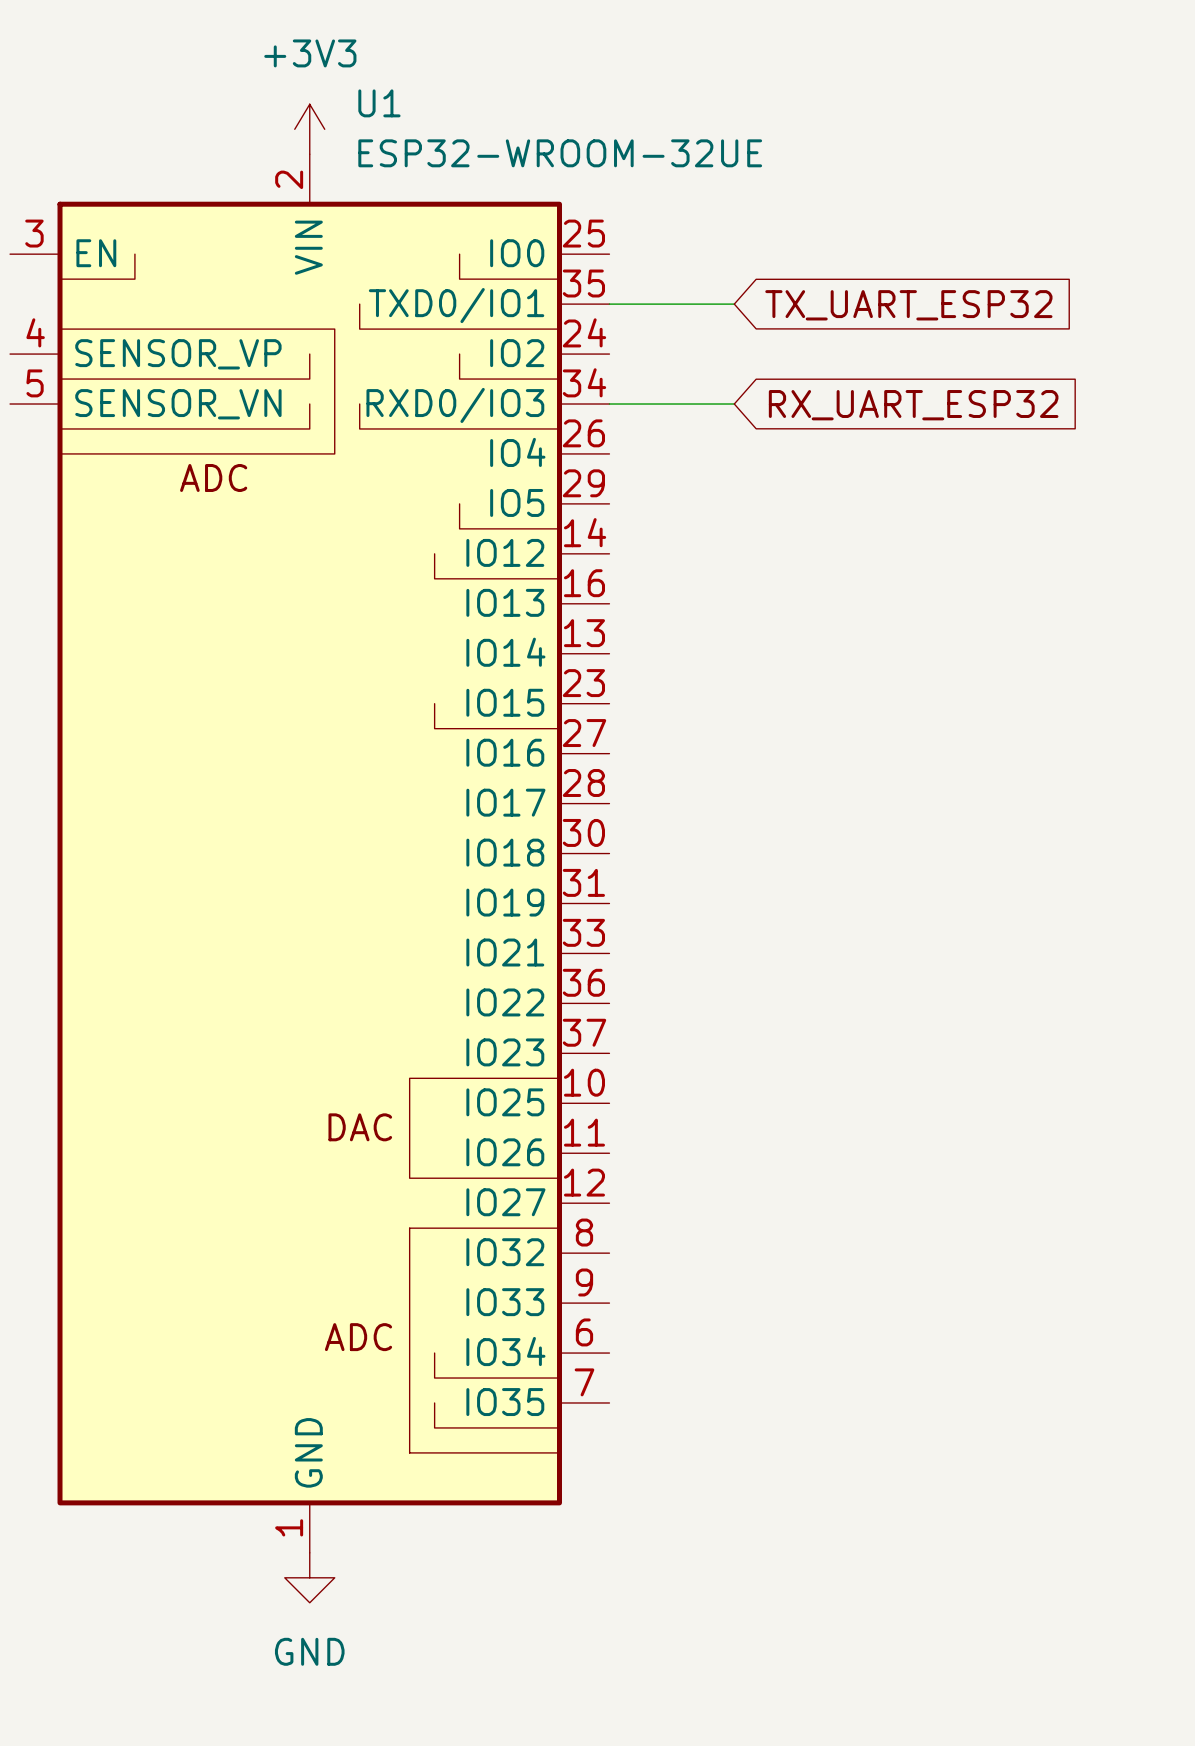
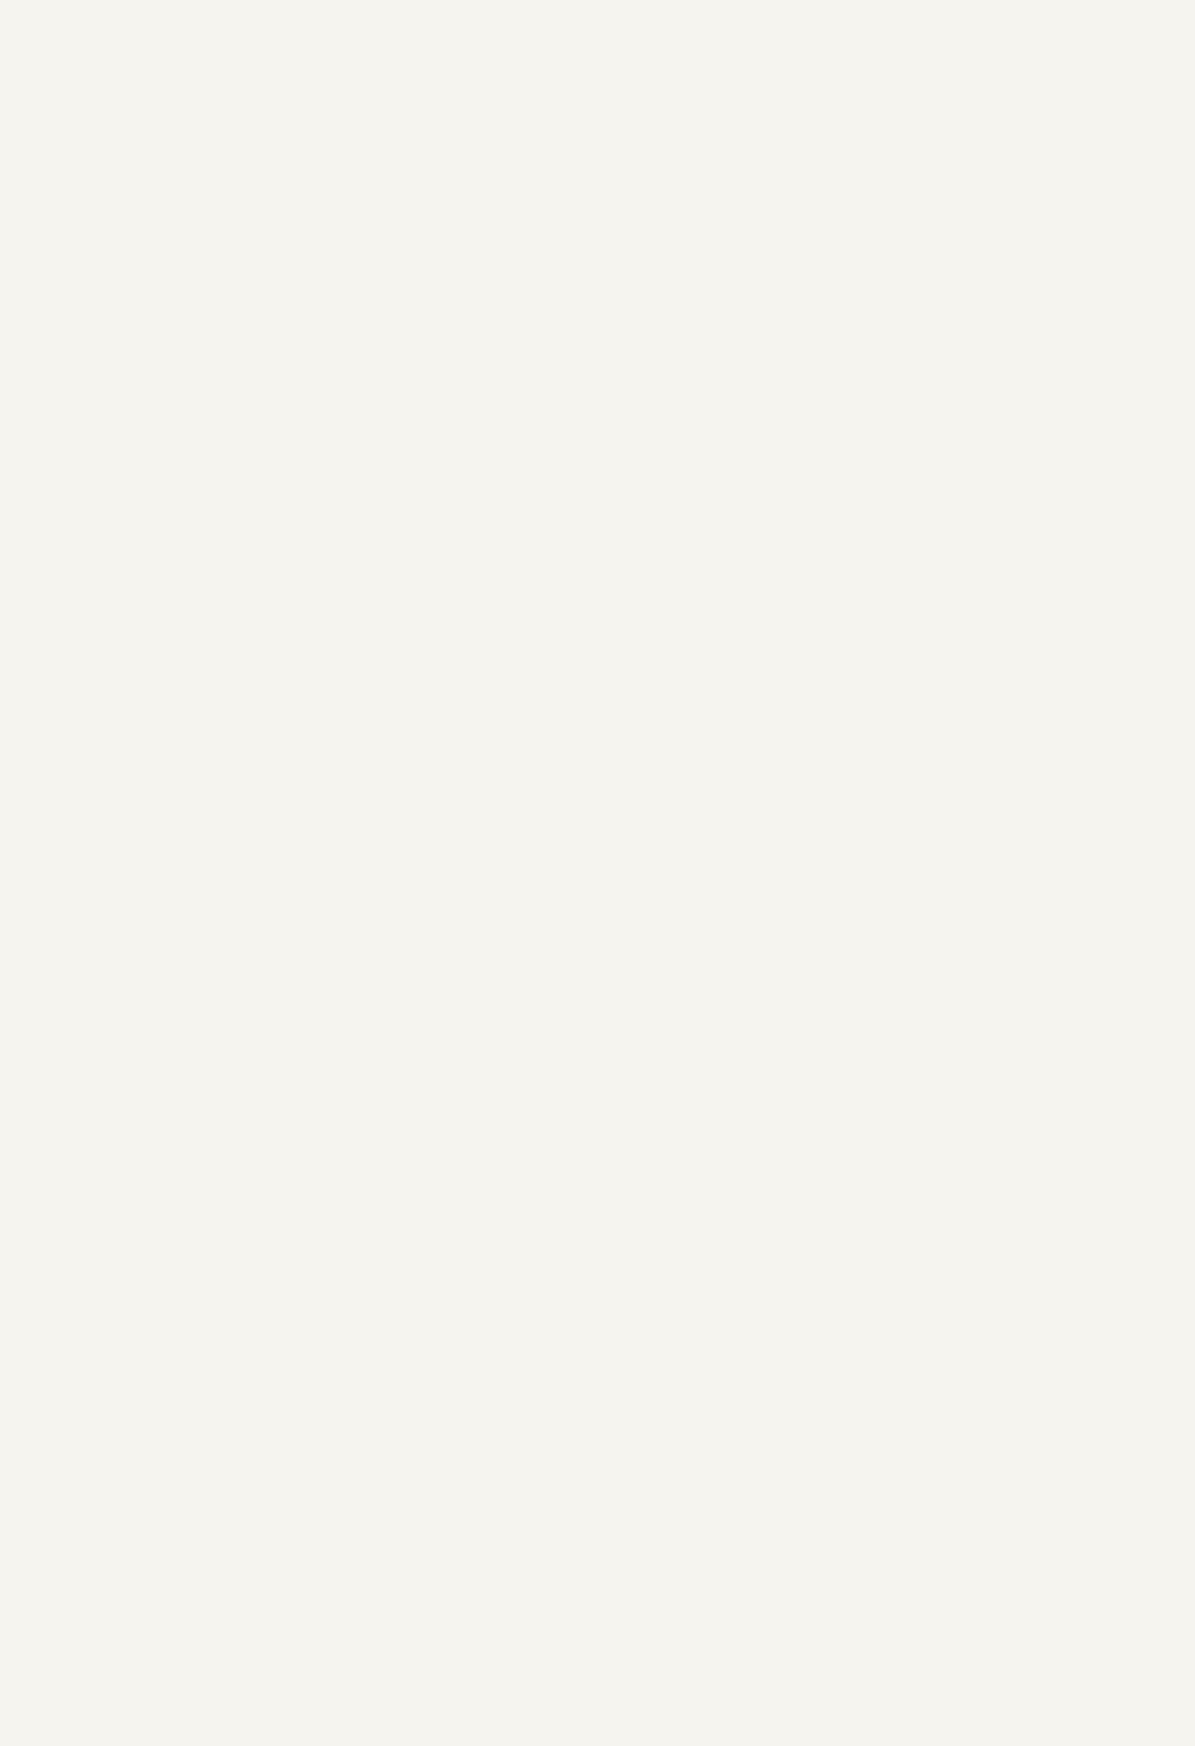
power symbol: +3V3 (309, 129) -> none
wire: (609, 304) (734, 304) -> none
global label: TX_UART_ESP32 (908, 305) -> none
wire: (609, 404) (734, 404) -> none
global label: RX_UART_ESP32 (913, 405) -> none
U1: ESP32-WROOM-32UE (309, 853) -> none
power symbol: GND (309, 1577) -> none

